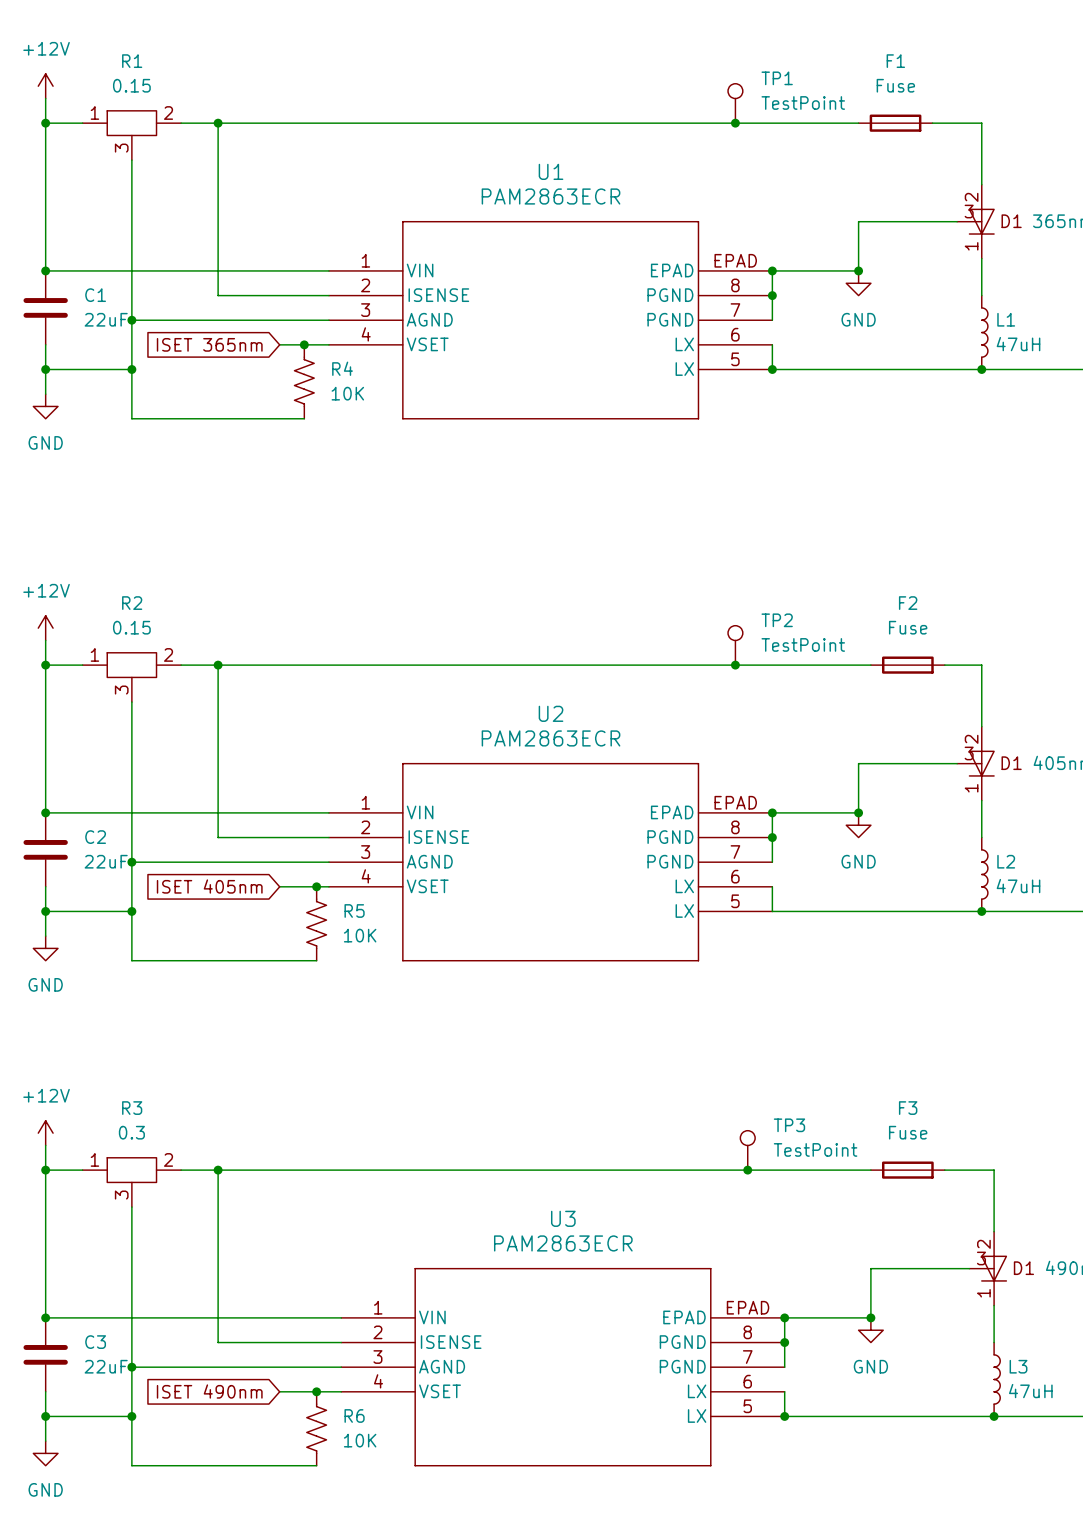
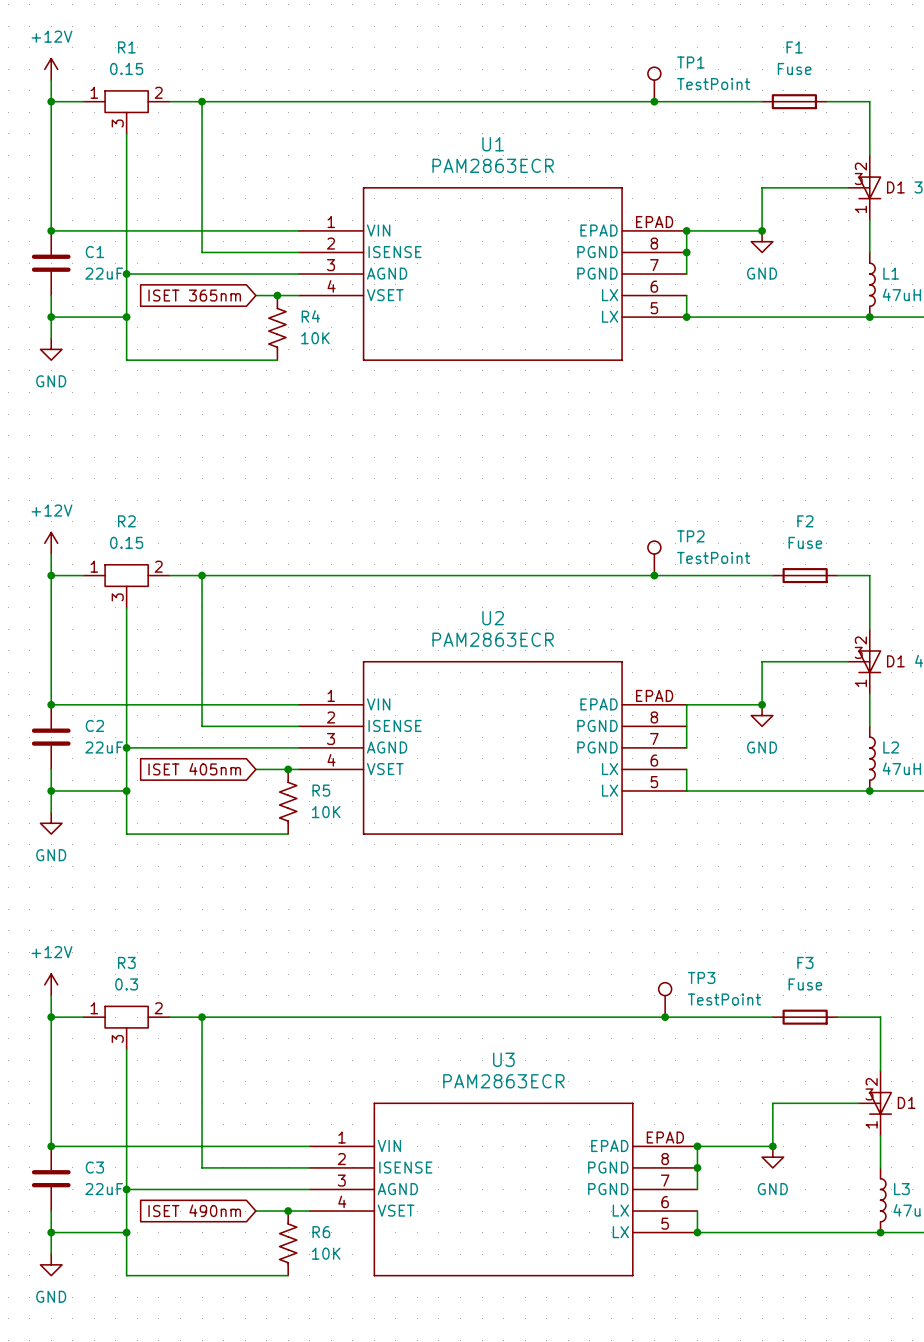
junction: (772, 812) -> none
junction: (772, 837) -> none

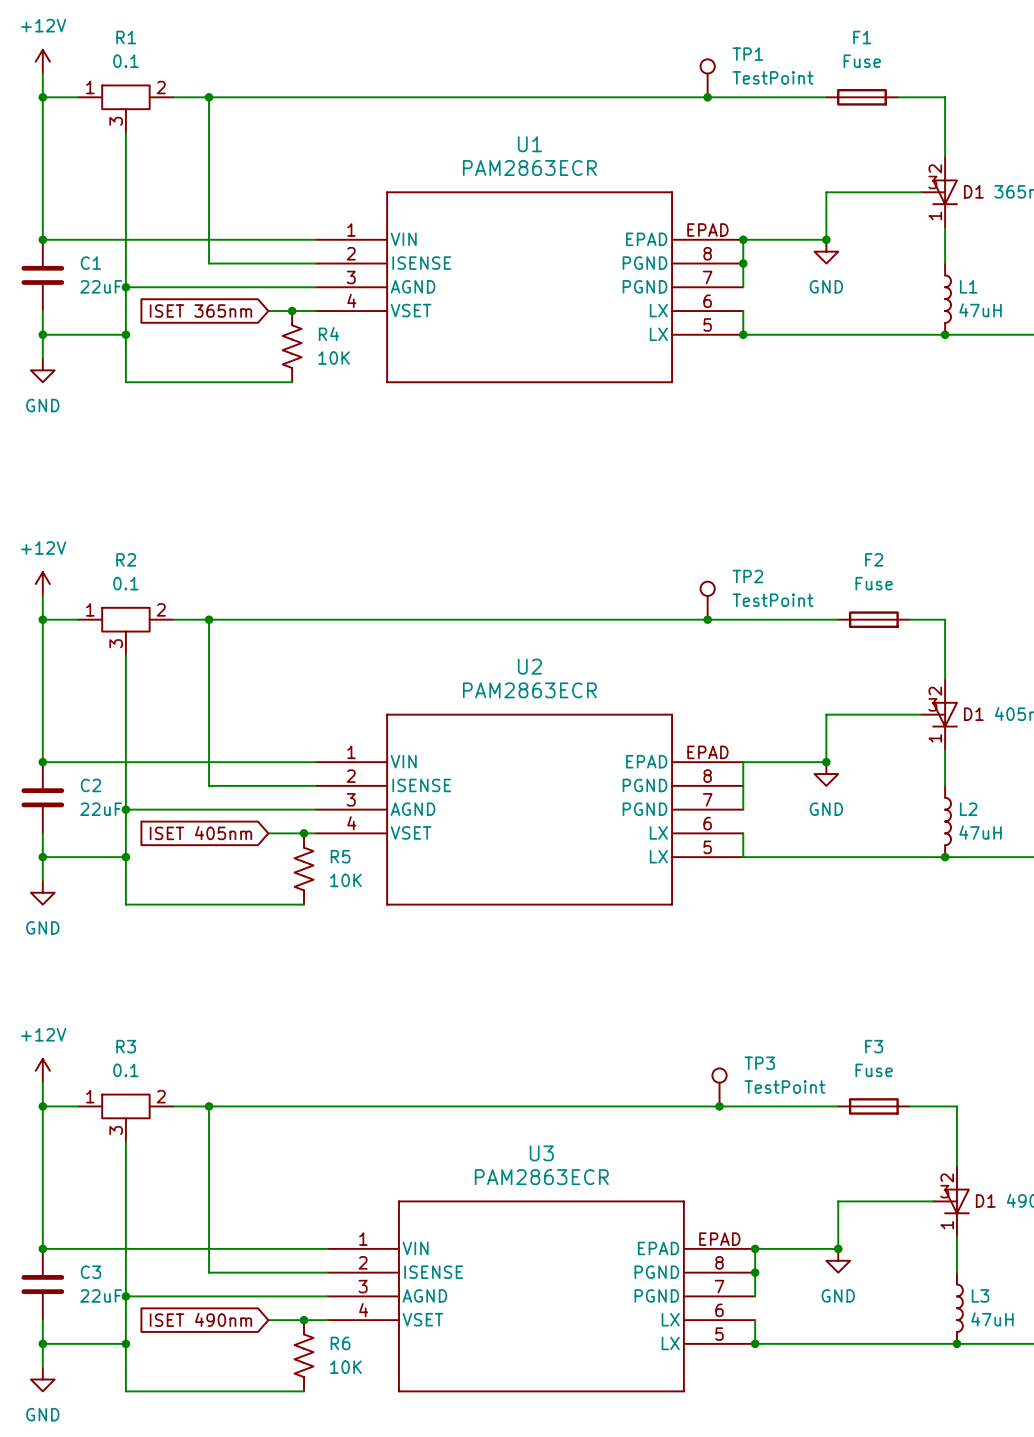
R1 value: 0.15 (126, 68) -> 0.1 (125, 61)
R2 value: 0.15 (126, 542) -> 0.1 (125, 583)
R3 value: 0.3 (126, 984) -> 0.1 (125, 1070)

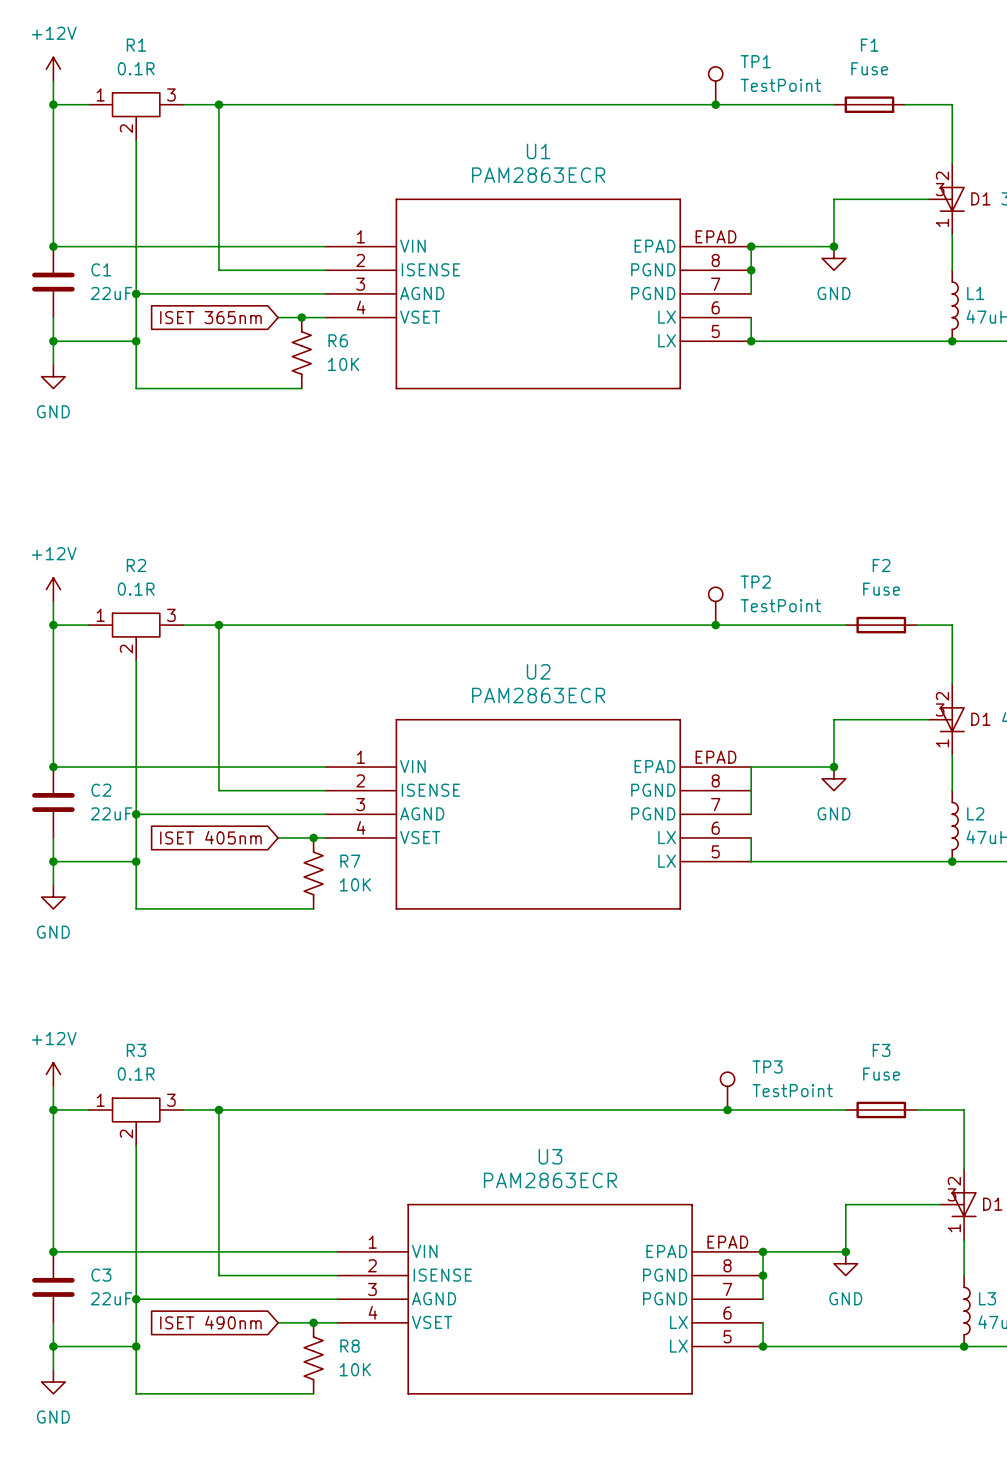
R1 value: 0.1 (125, 61) -> 0.1R (136, 68)
R1 pin number: 2 (161, 87) -> 3 (171, 94)
R1 pin number: 3 (116, 121) -> 2 (126, 128)
R4 name: R4 (328, 334) -> R6 (338, 340)
R2 value: 0.1 (125, 583) -> 0.1R (136, 589)
R2 pin number: 2 (161, 609) -> 3 (171, 615)
R2 pin number: 3 (116, 643) -> 2 (126, 649)
R5 name: R5 (340, 856) -> R7 (350, 861)
R3 value: 0.1 (125, 1070) -> 0.1R (136, 1074)
R3 pin number: 2 (161, 1096) -> 3 (171, 1100)
R3 pin number: 3 (116, 1130) -> 2 (126, 1133)
R6 name: R6 (340, 1343) -> R8 (350, 1346)

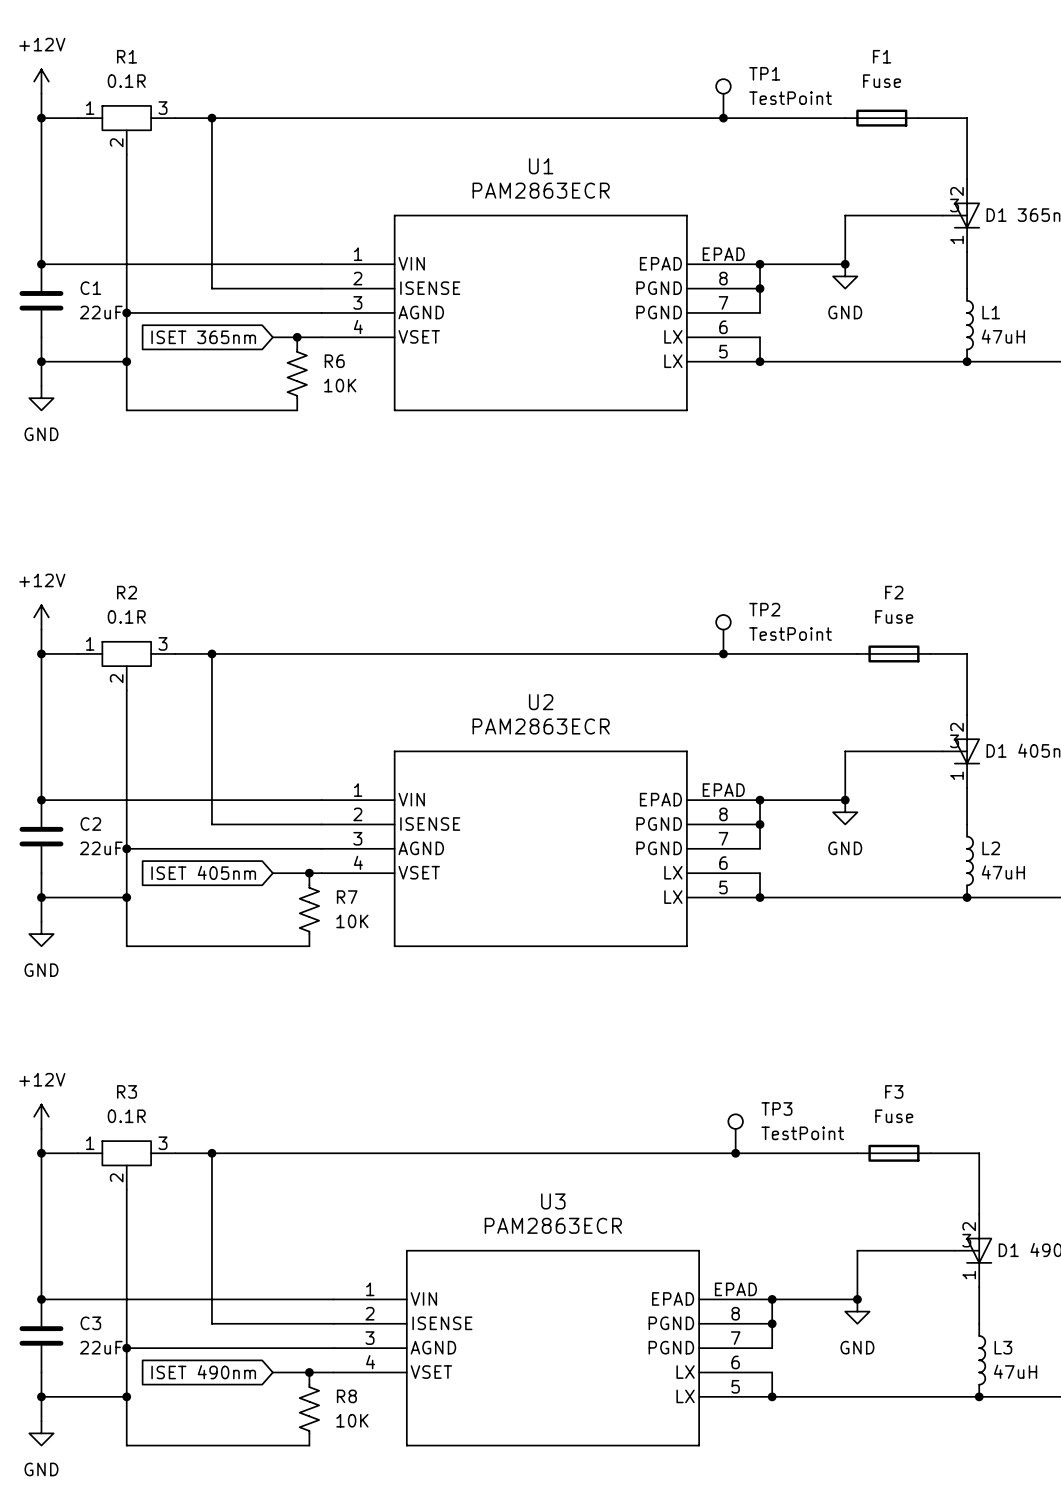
junction: none -> (760, 800)
junction: none -> (760, 824)
junction: none -> (760, 897)

